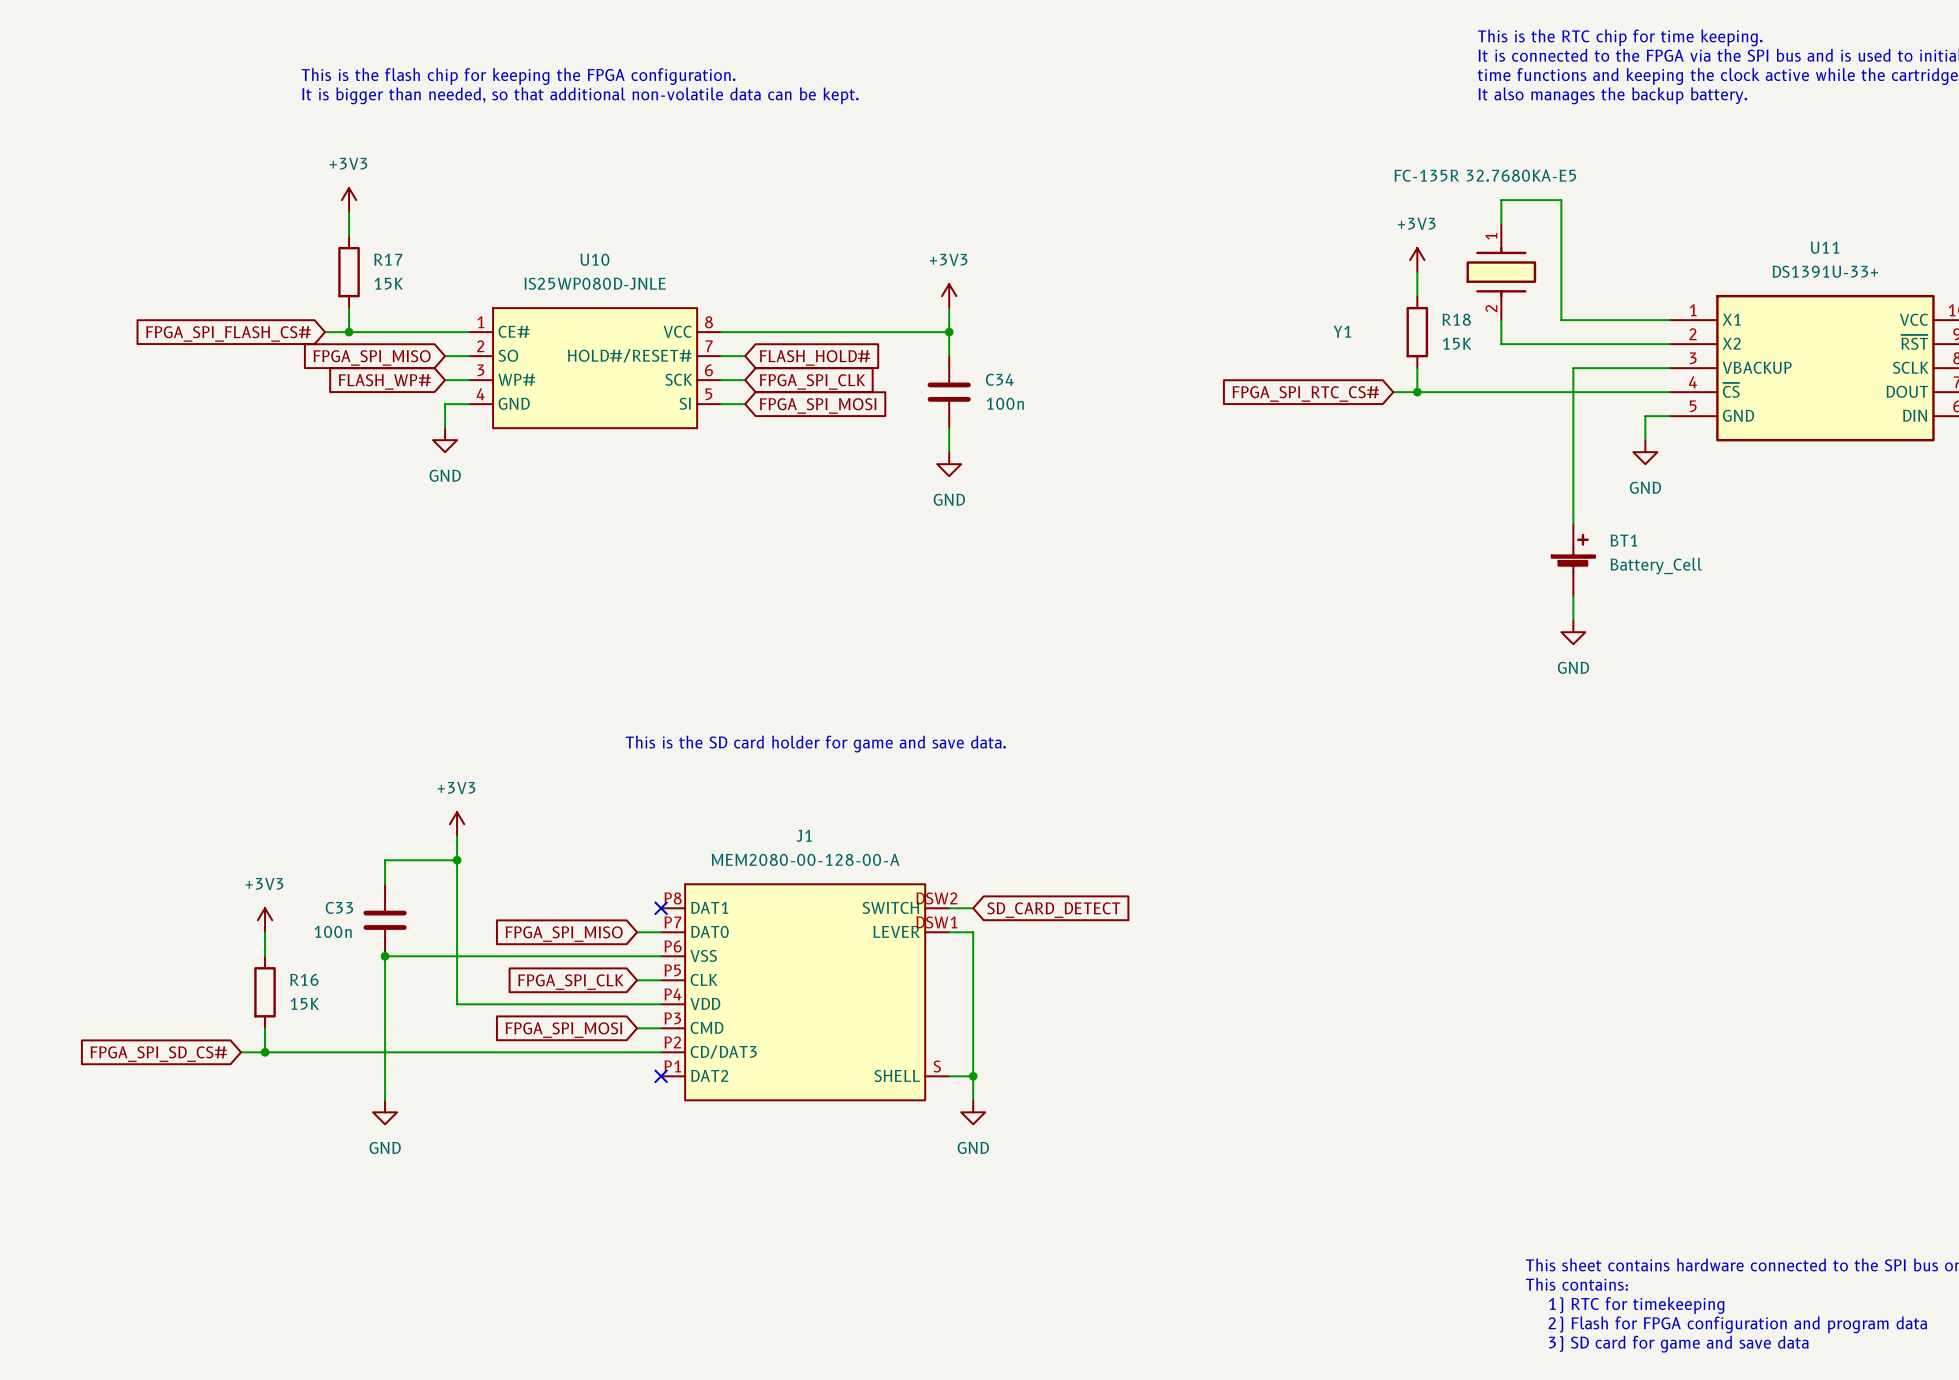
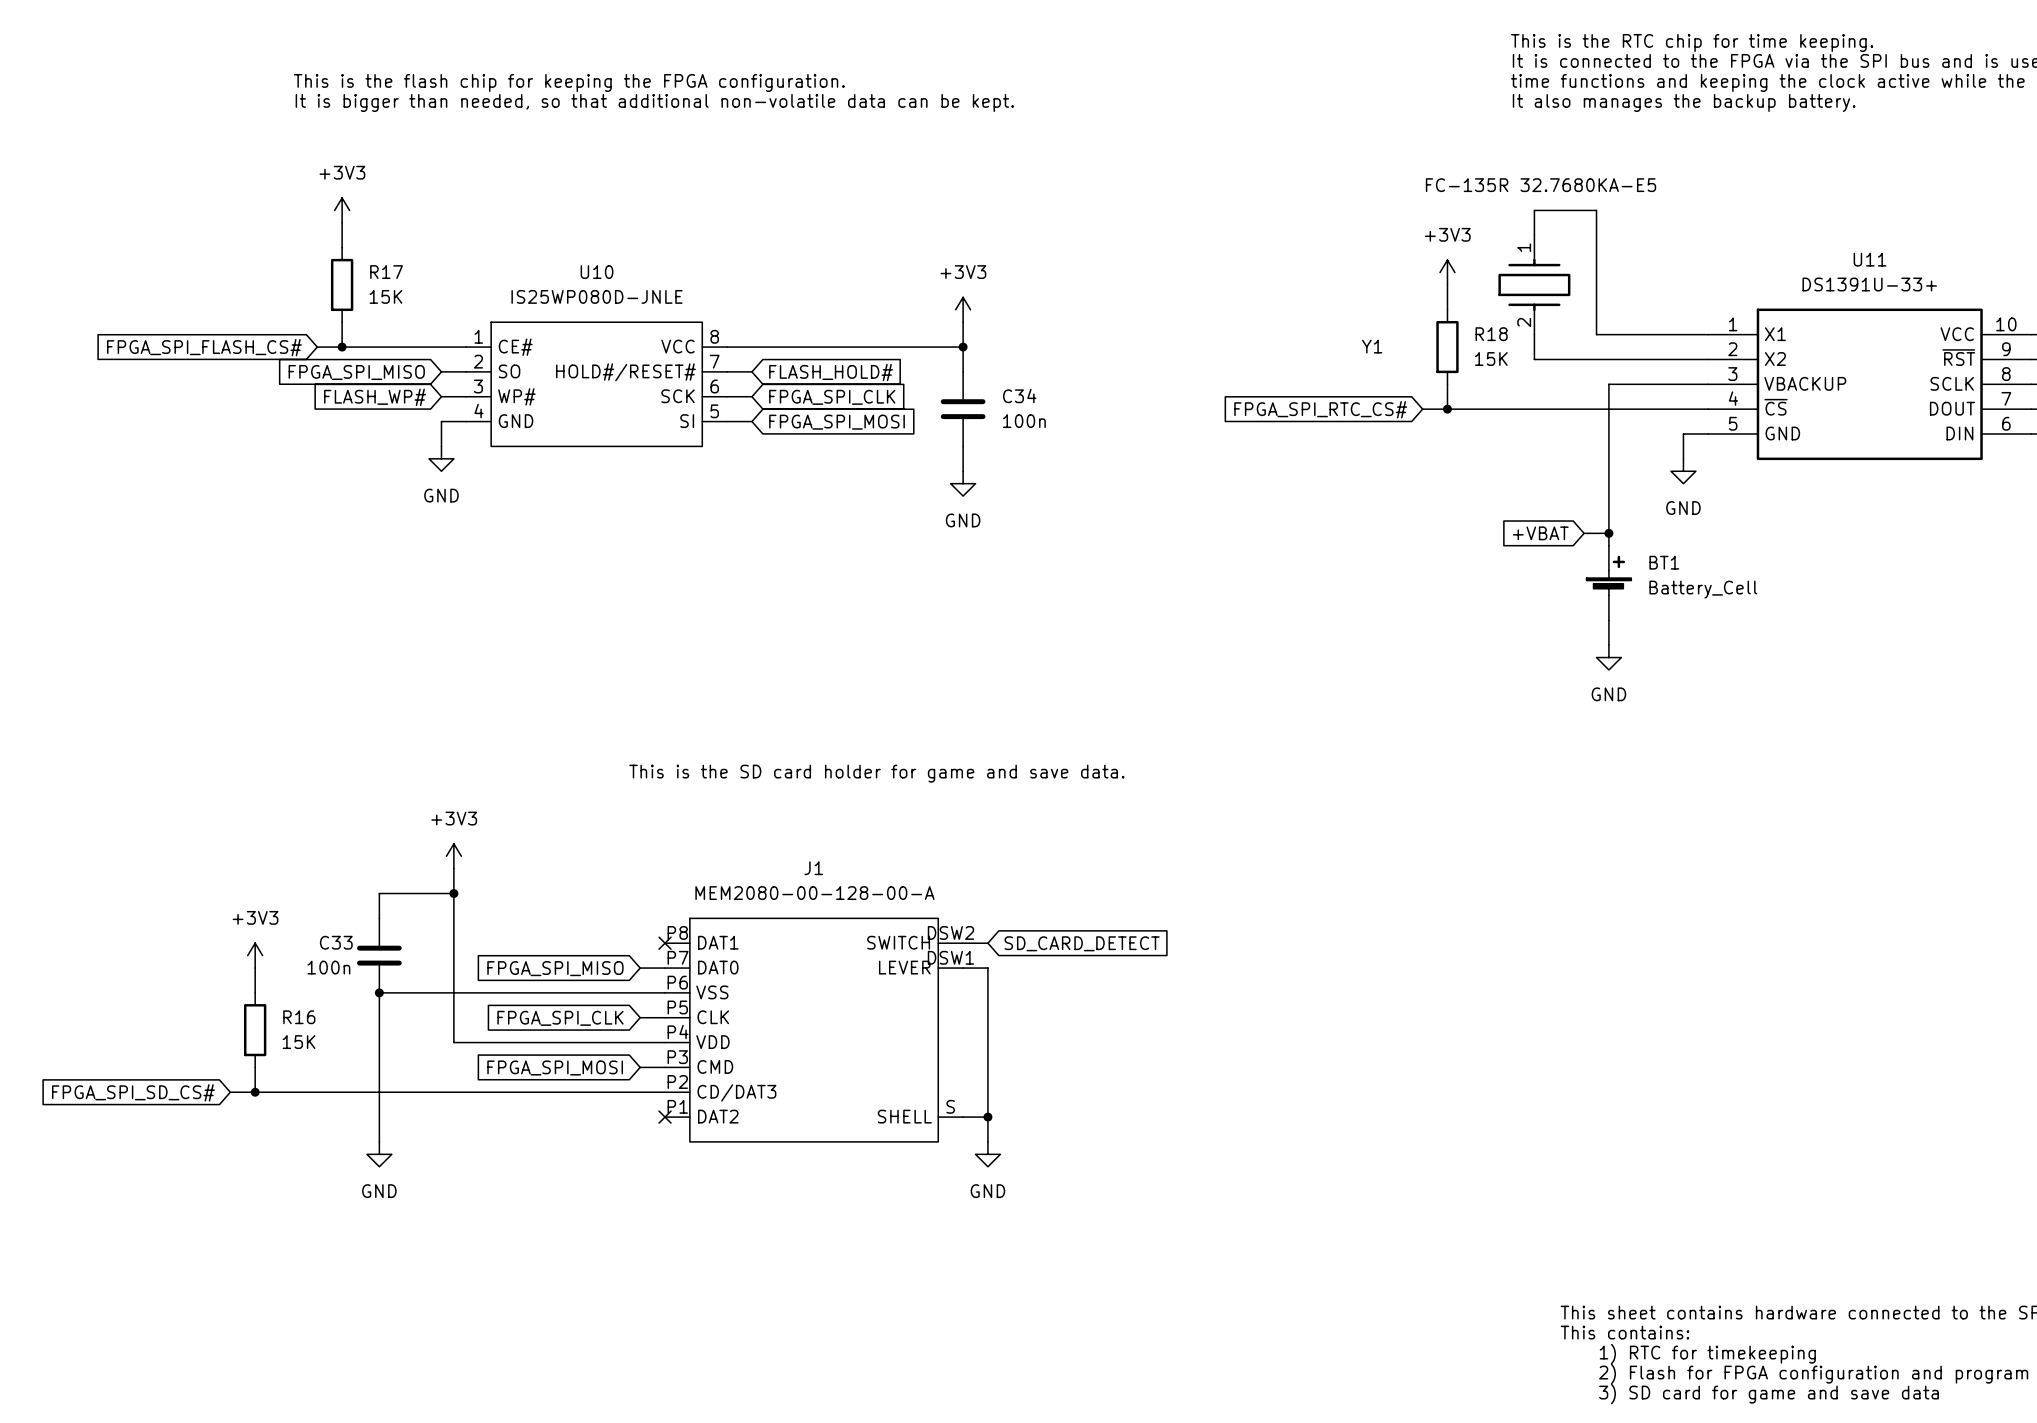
global label: none -> +VBAT (1540, 533)
wire: none -> (1584, 533) (1608, 533)
junction: none -> (1608, 533)

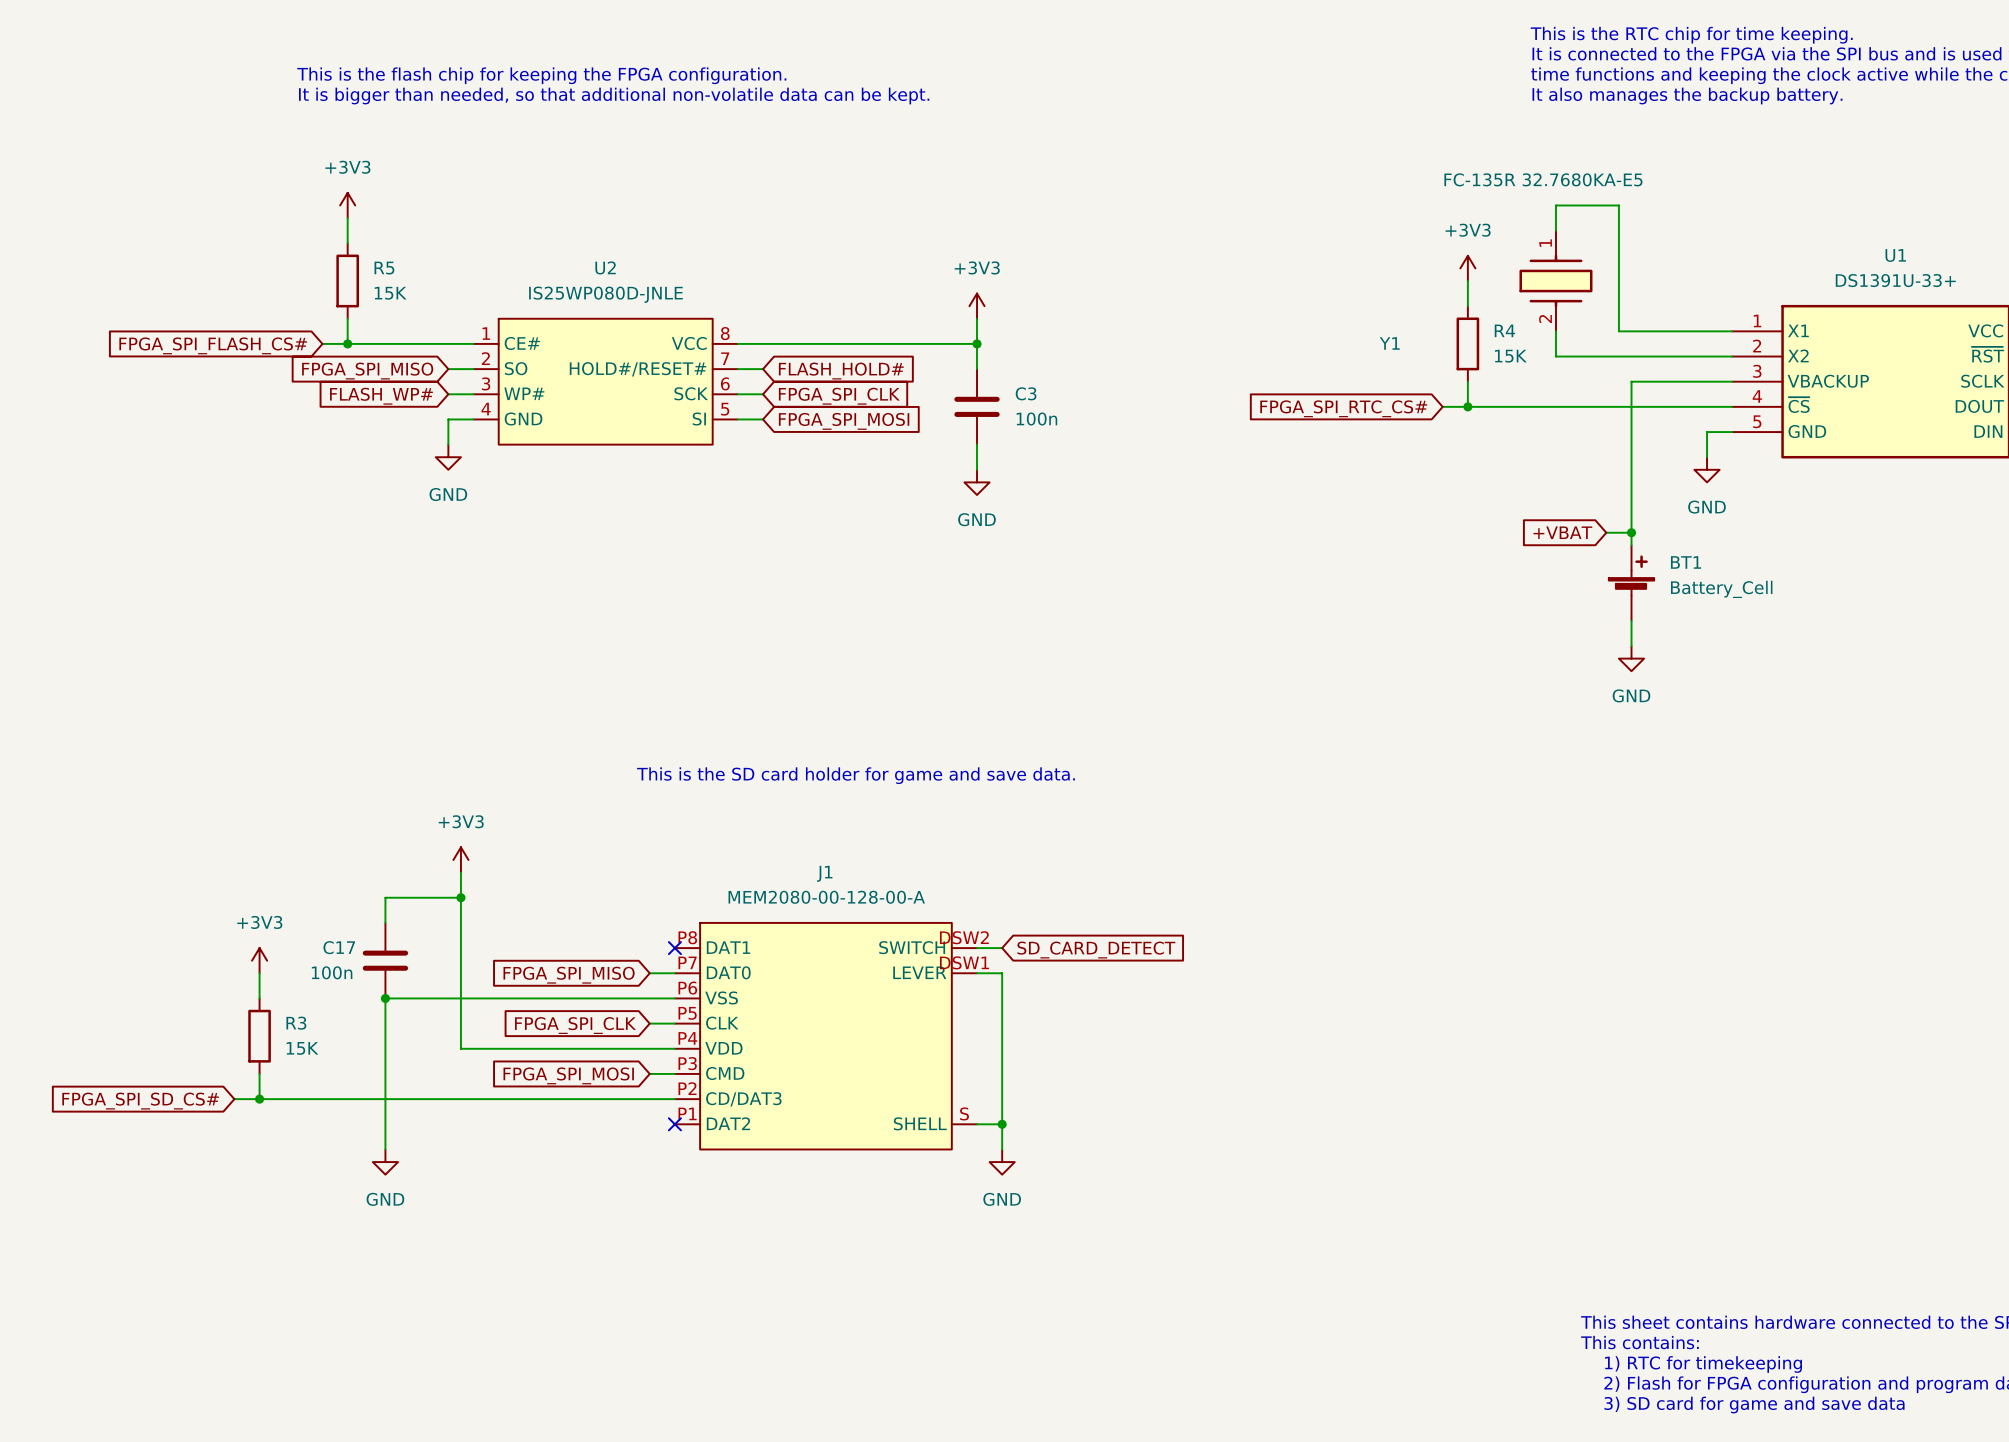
U11 name: U11 (1870, 259) -> U1 (1895, 255)
R17 name: R17 (386, 272) -> R5 (384, 268)
U10 name: U10 (597, 272) -> U2 (605, 267)
R18 name: R18 (1491, 334) -> R4 (1504, 330)
C34 name: C34 (1019, 395) -> C3 (1026, 393)
C33 name: C33 (336, 942) -> C17 (339, 947)
R16 name: R16 (299, 1017) -> R3 (296, 1023)

